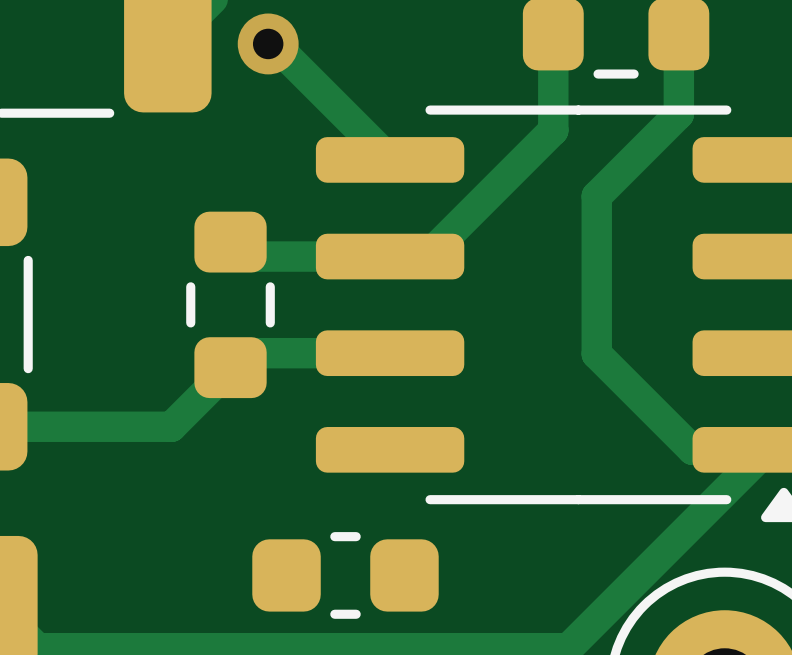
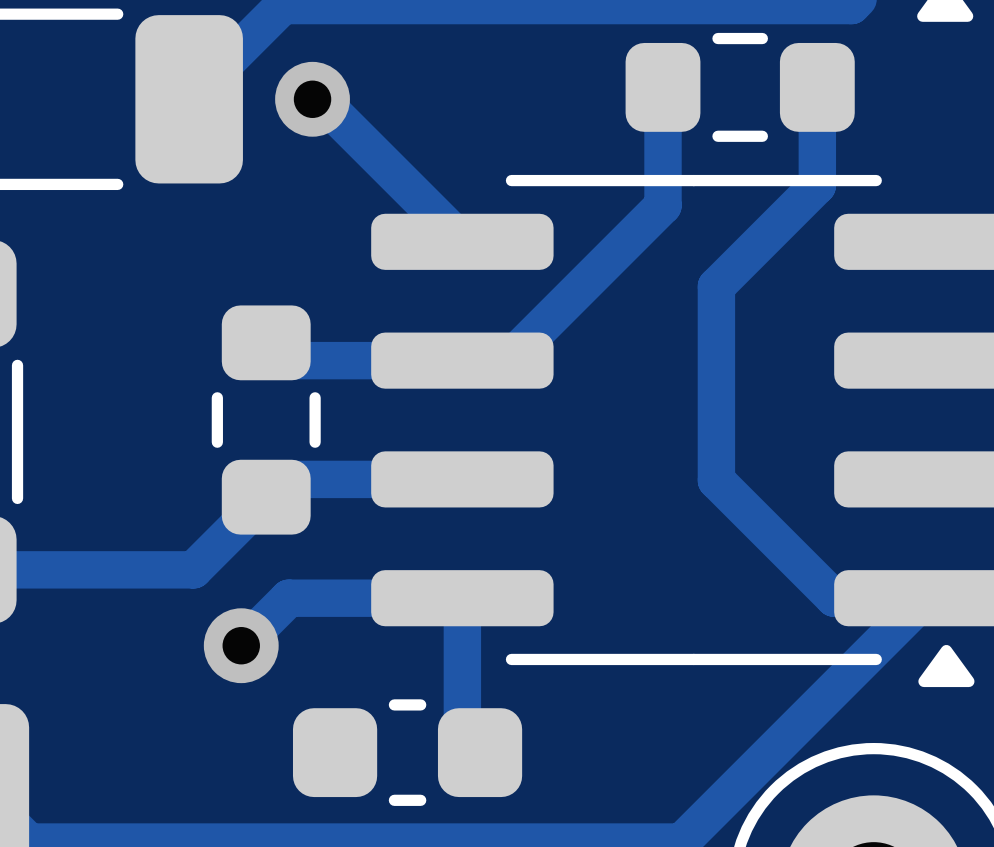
track: none -> (241, 645) (288, 598) (462, 598) (462, 734) (480, 752)
via: none -> (241, 645)

